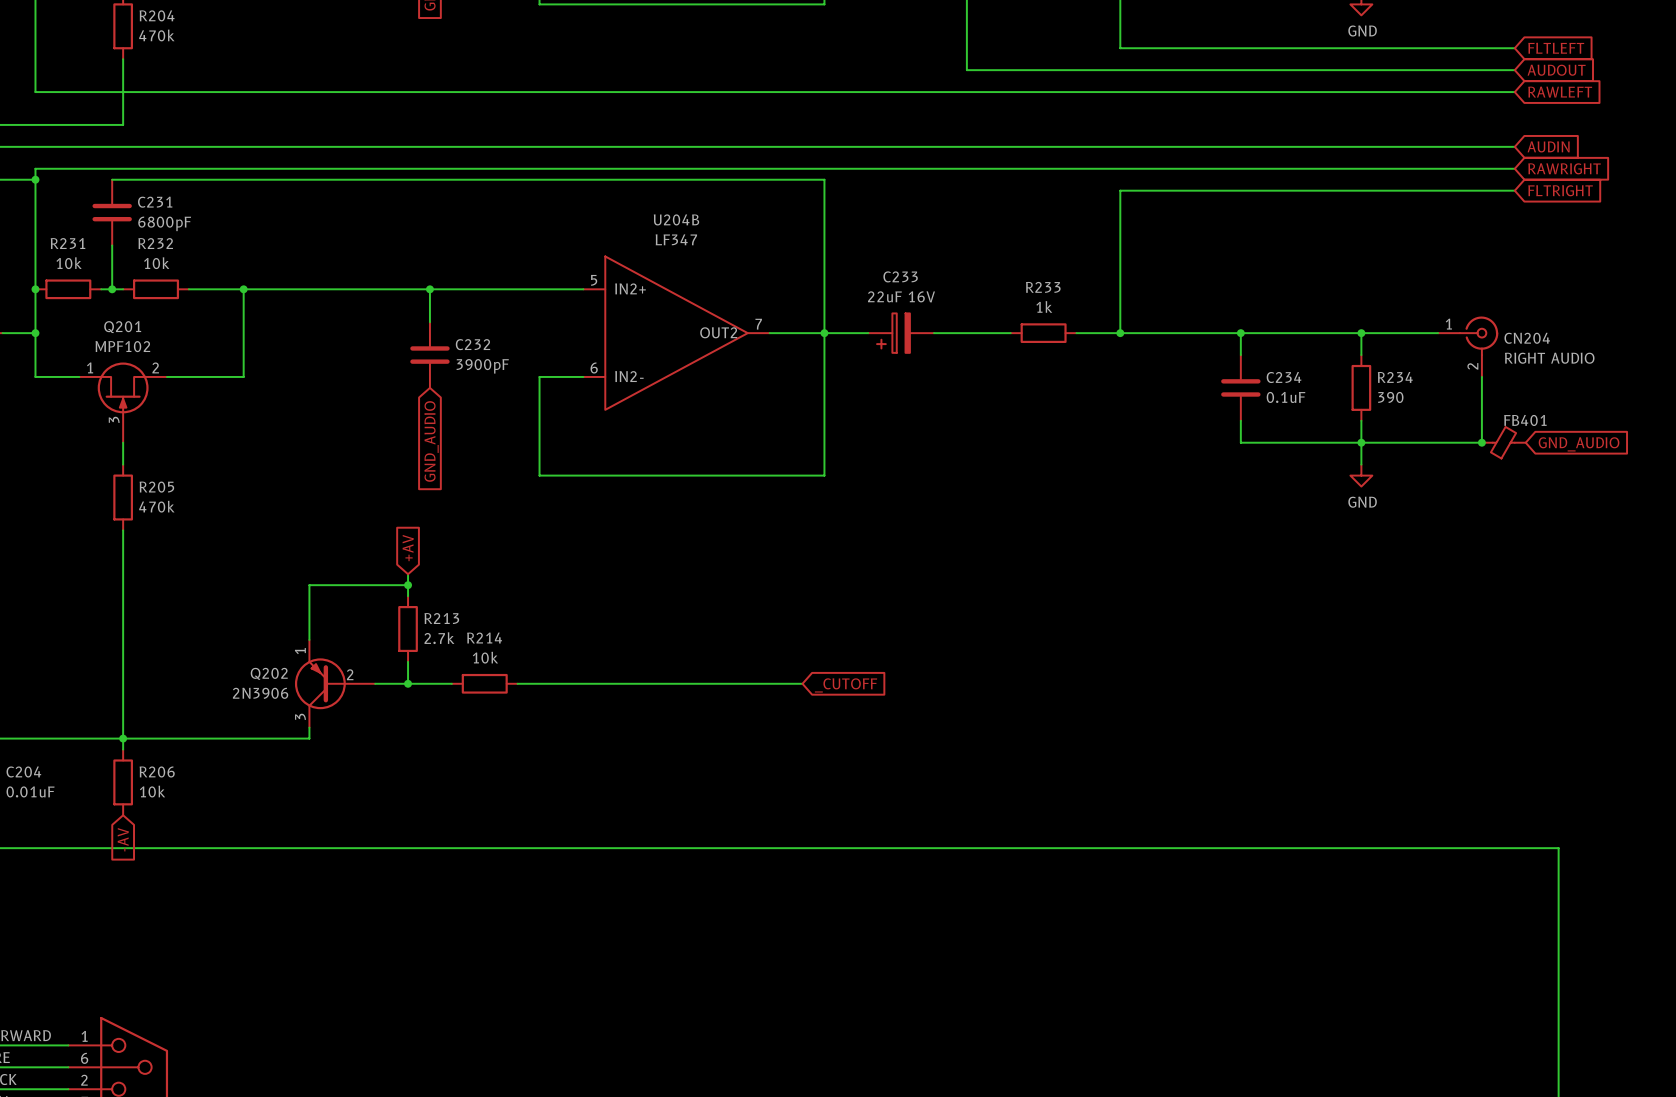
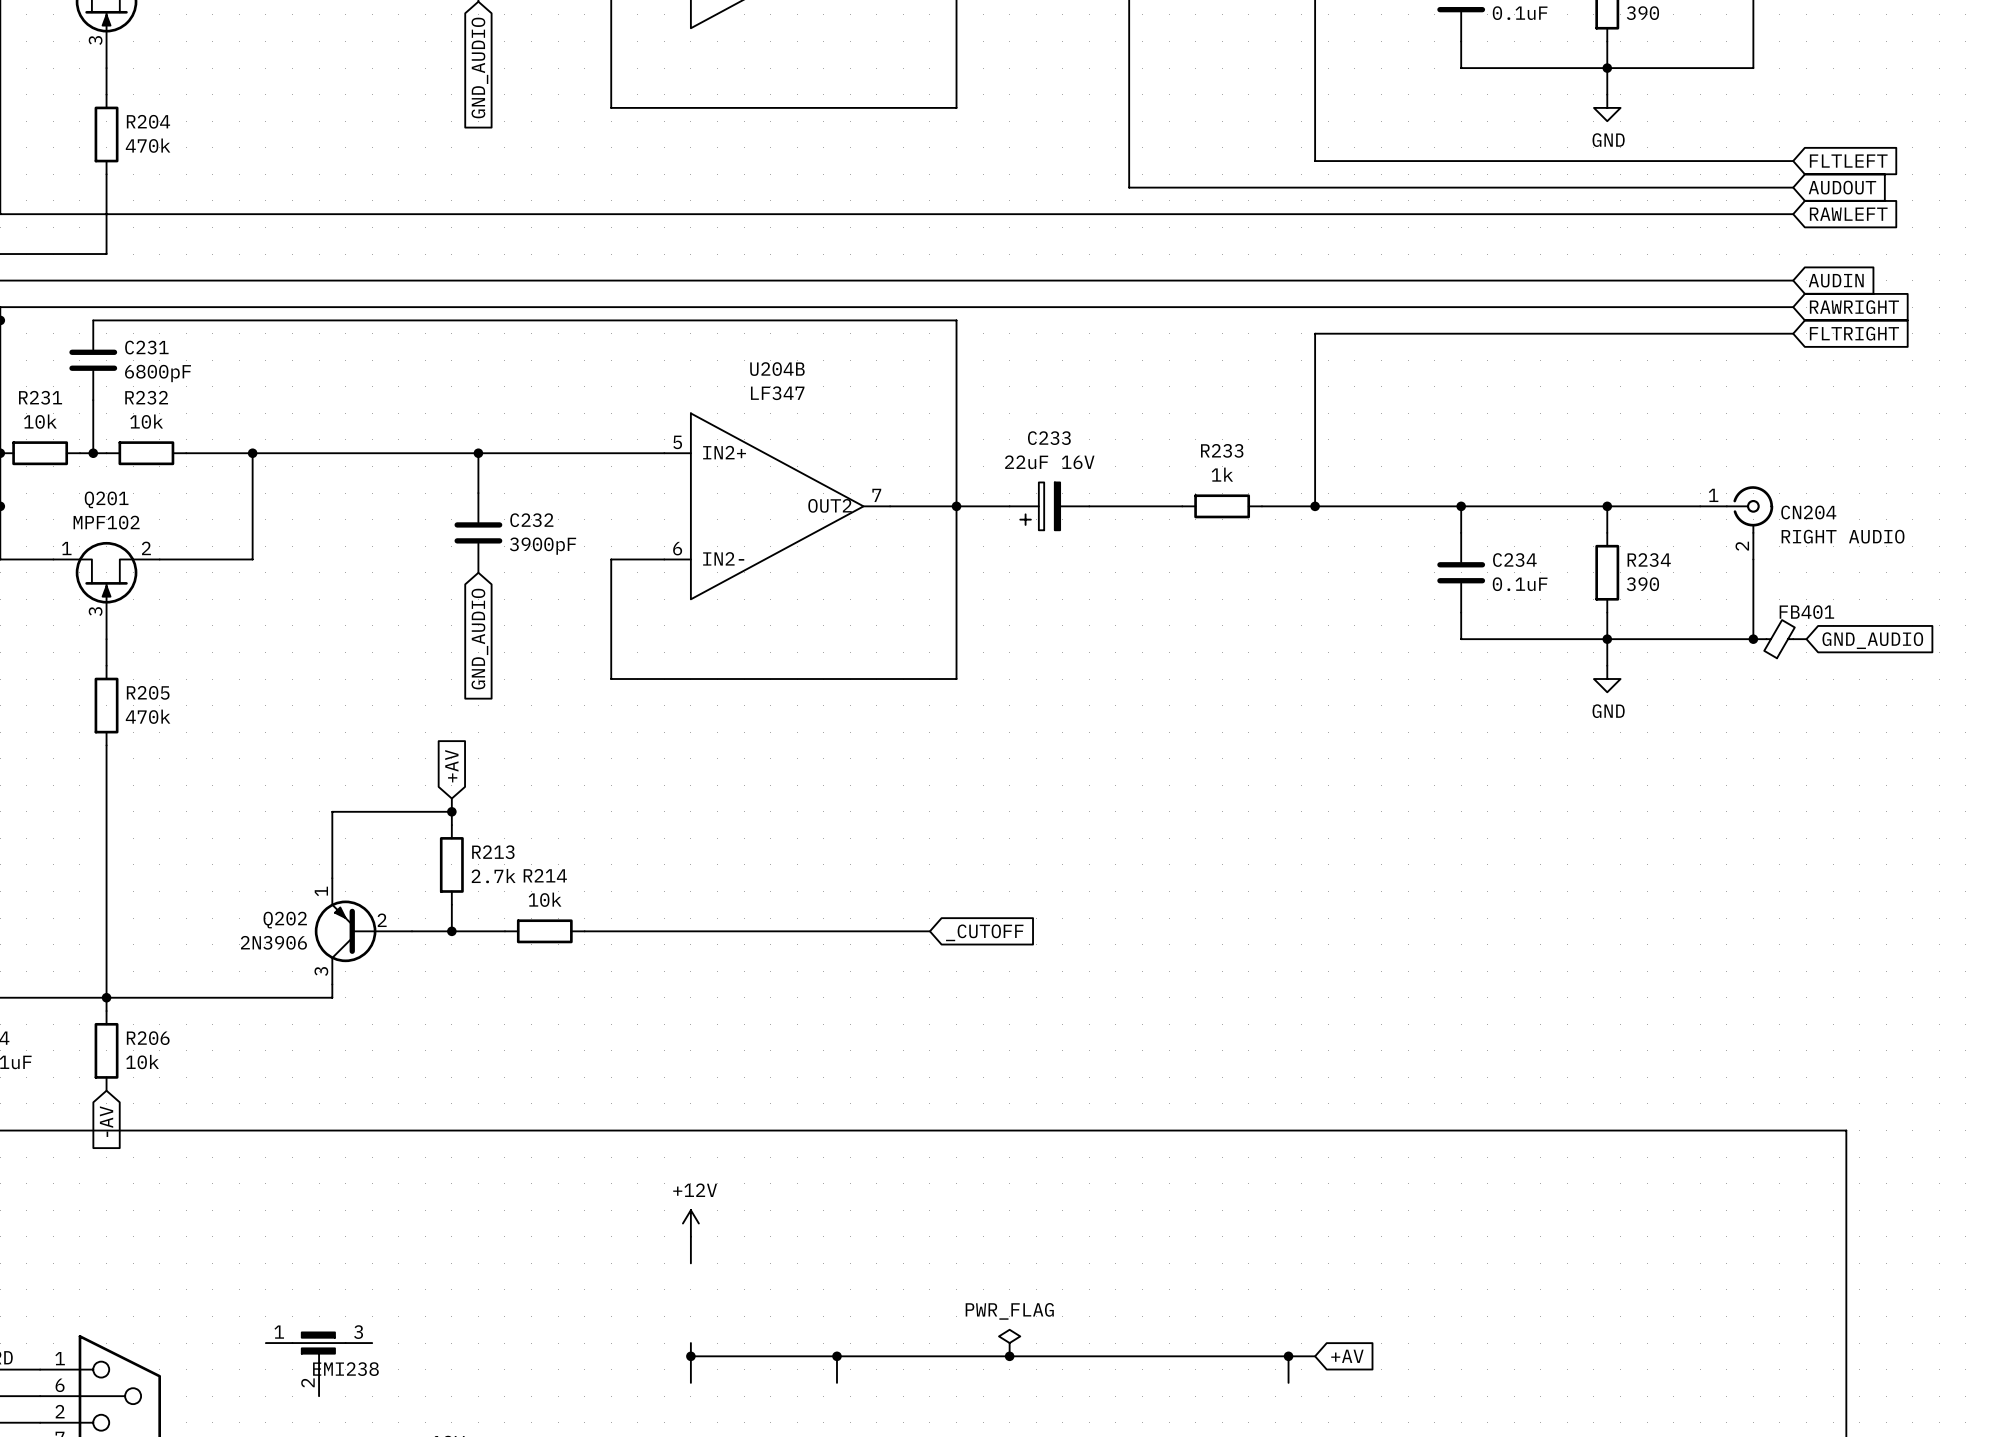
power symbol: none -> +12V (690, 1223)
wire: none -> (690, 1236) (690, 1263)
wire: none -> (690, 1343) (690, 1382)
power symbol: none -> PWR_FLAG (1009, 1343)
wire: none -> (690, 1356) (1315, 1356)
junction: none -> (690, 1356)
wire: none -> (836, 1356) (836, 1382)
junction: none -> (836, 1356)
junction: none -> (1009, 1356)
wire: none -> (1288, 1356) (1288, 1382)
junction: none -> (1288, 1356)
global label: none -> +AV (1347, 1356)
EMI238: none -> (319, 1364)

